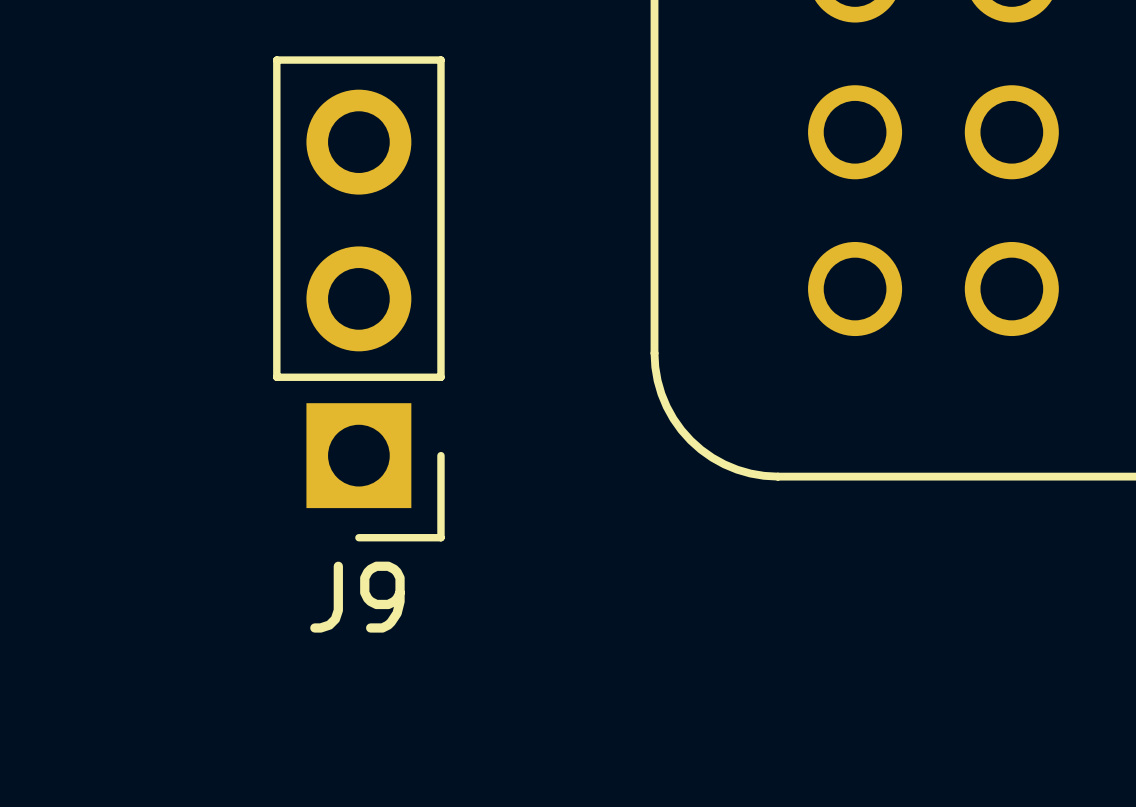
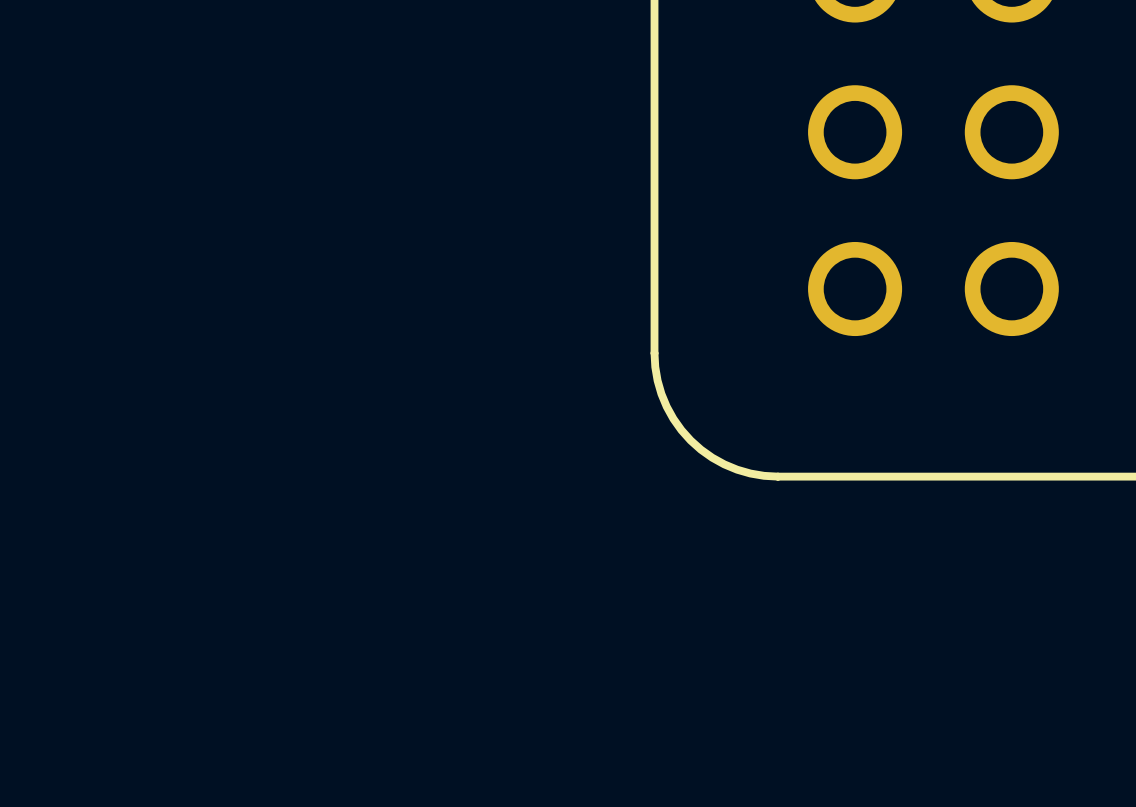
J9: (358, 298) -> none

